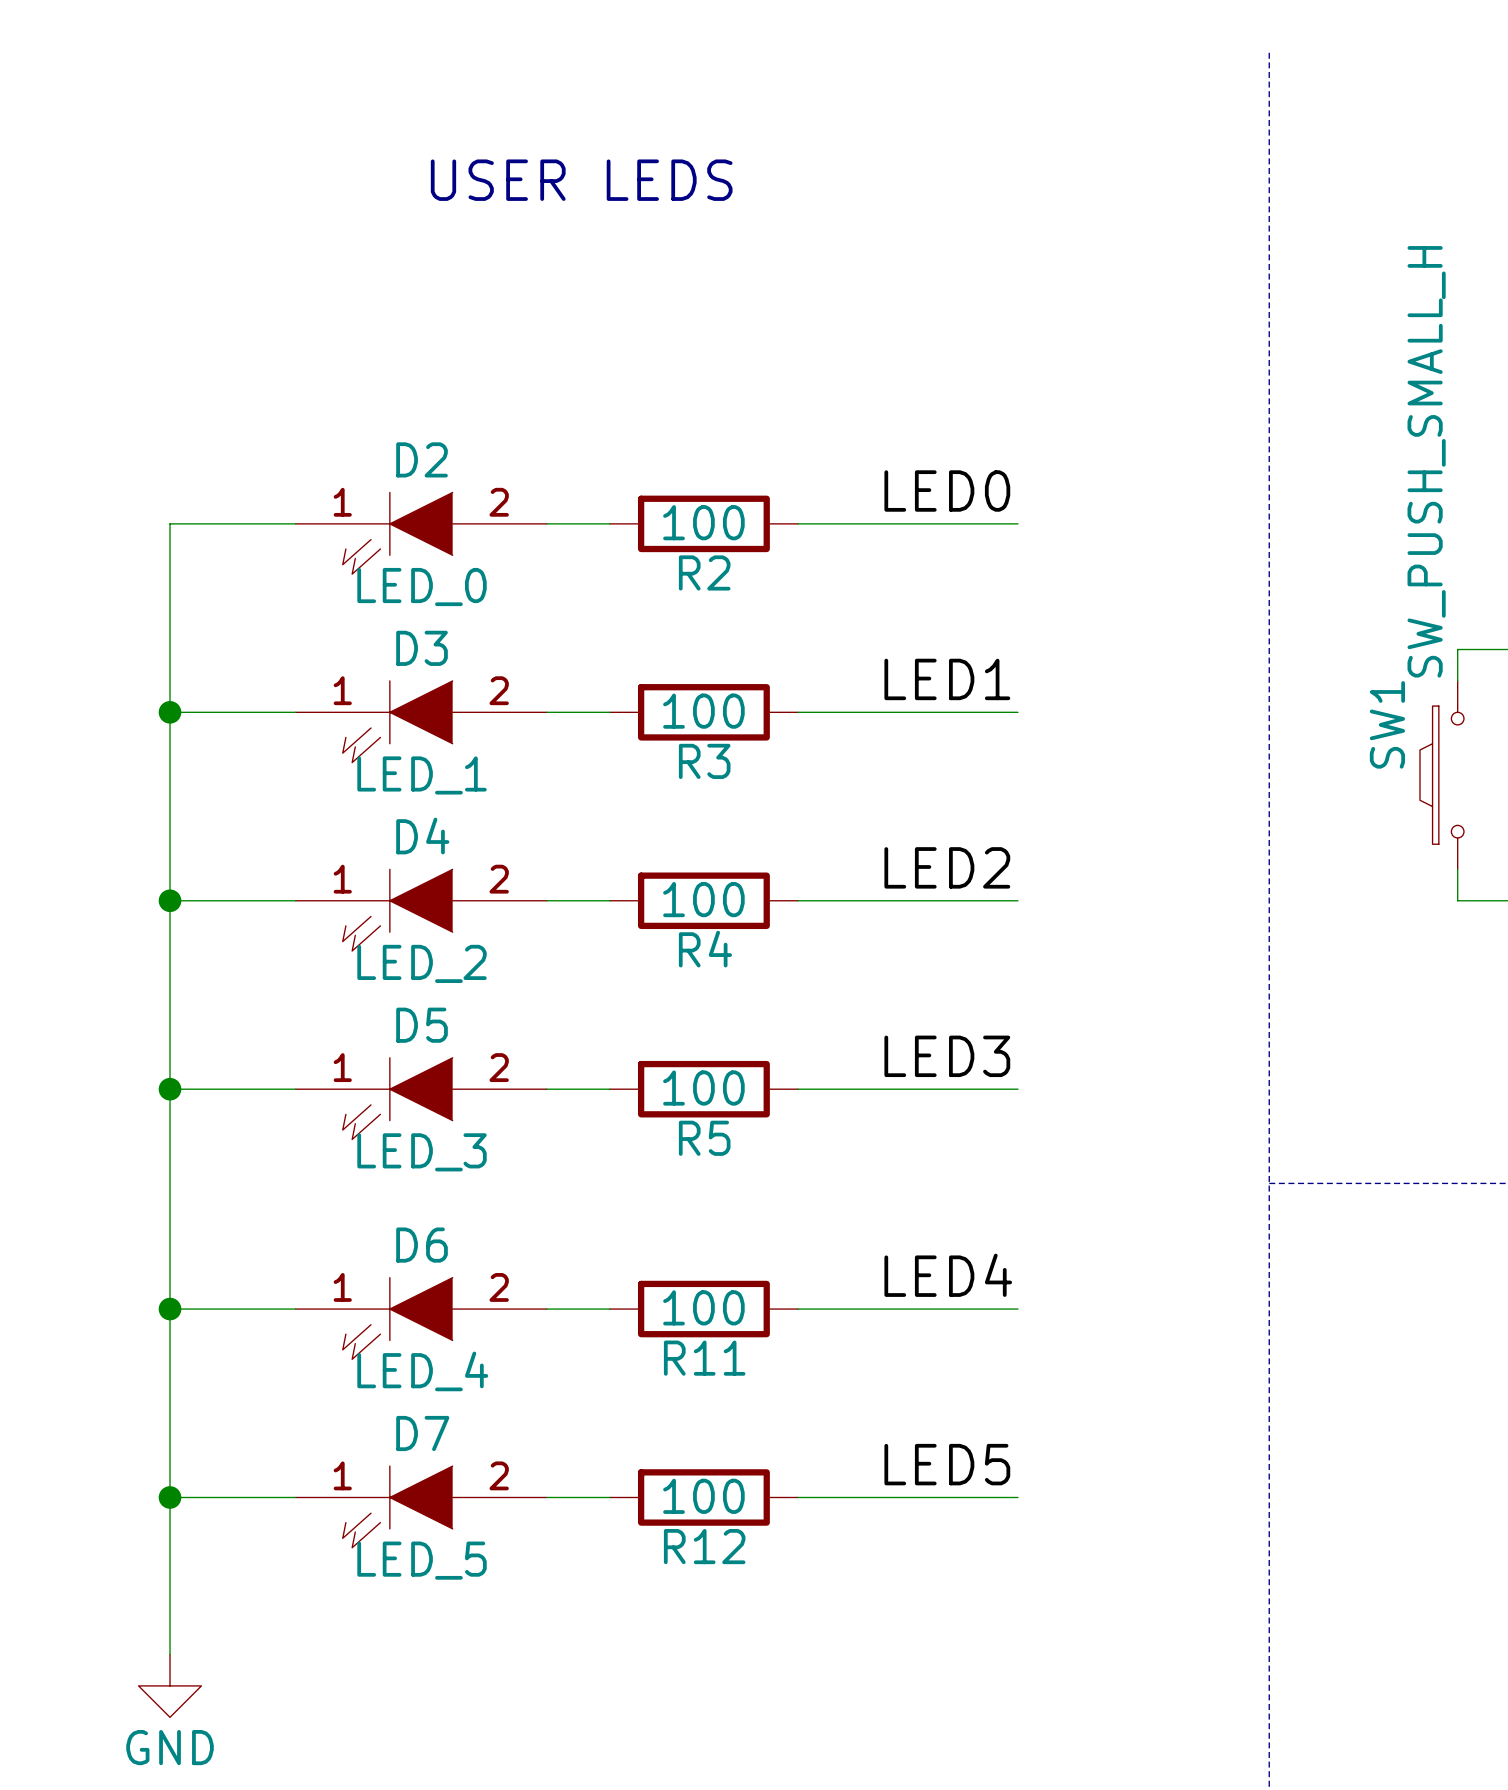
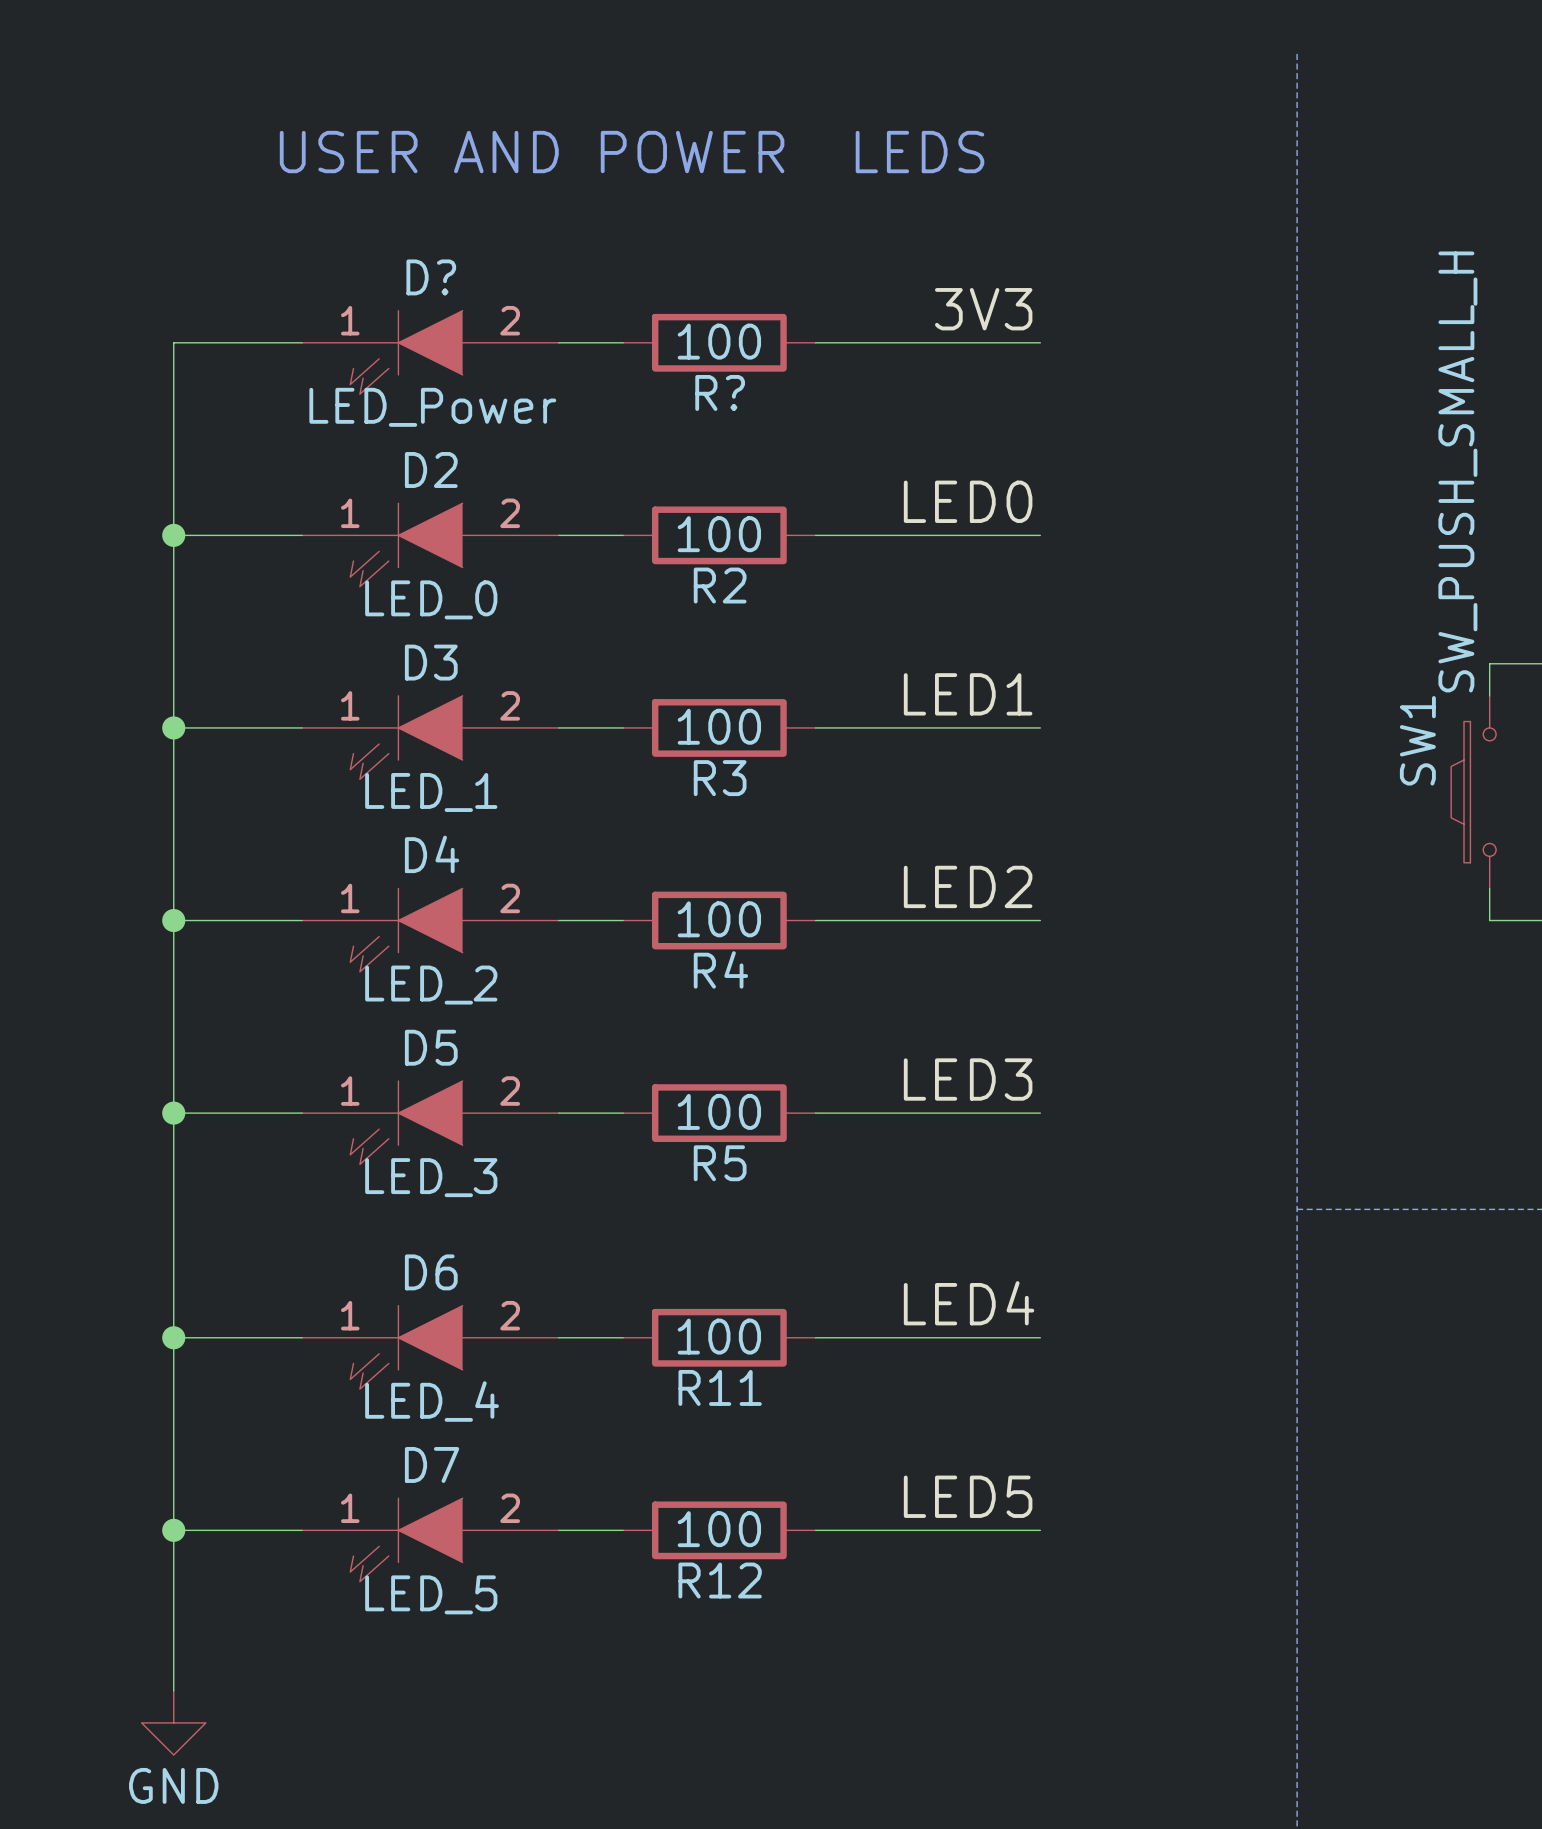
text: USER LEDS (581, 180) -> USER AND POWER LEDS (632, 152)
label: none -> 3V3 (983, 309)
wire: none -> (302, 342) (173, 342) (173, 535)
wire: none -> (558, 342) (623, 342)
R?: none -> 100 (719, 342)
wire: none -> (815, 342) (1040, 342)
D?: none -> LED_Power (430, 352)
junction: none -> (173, 535)

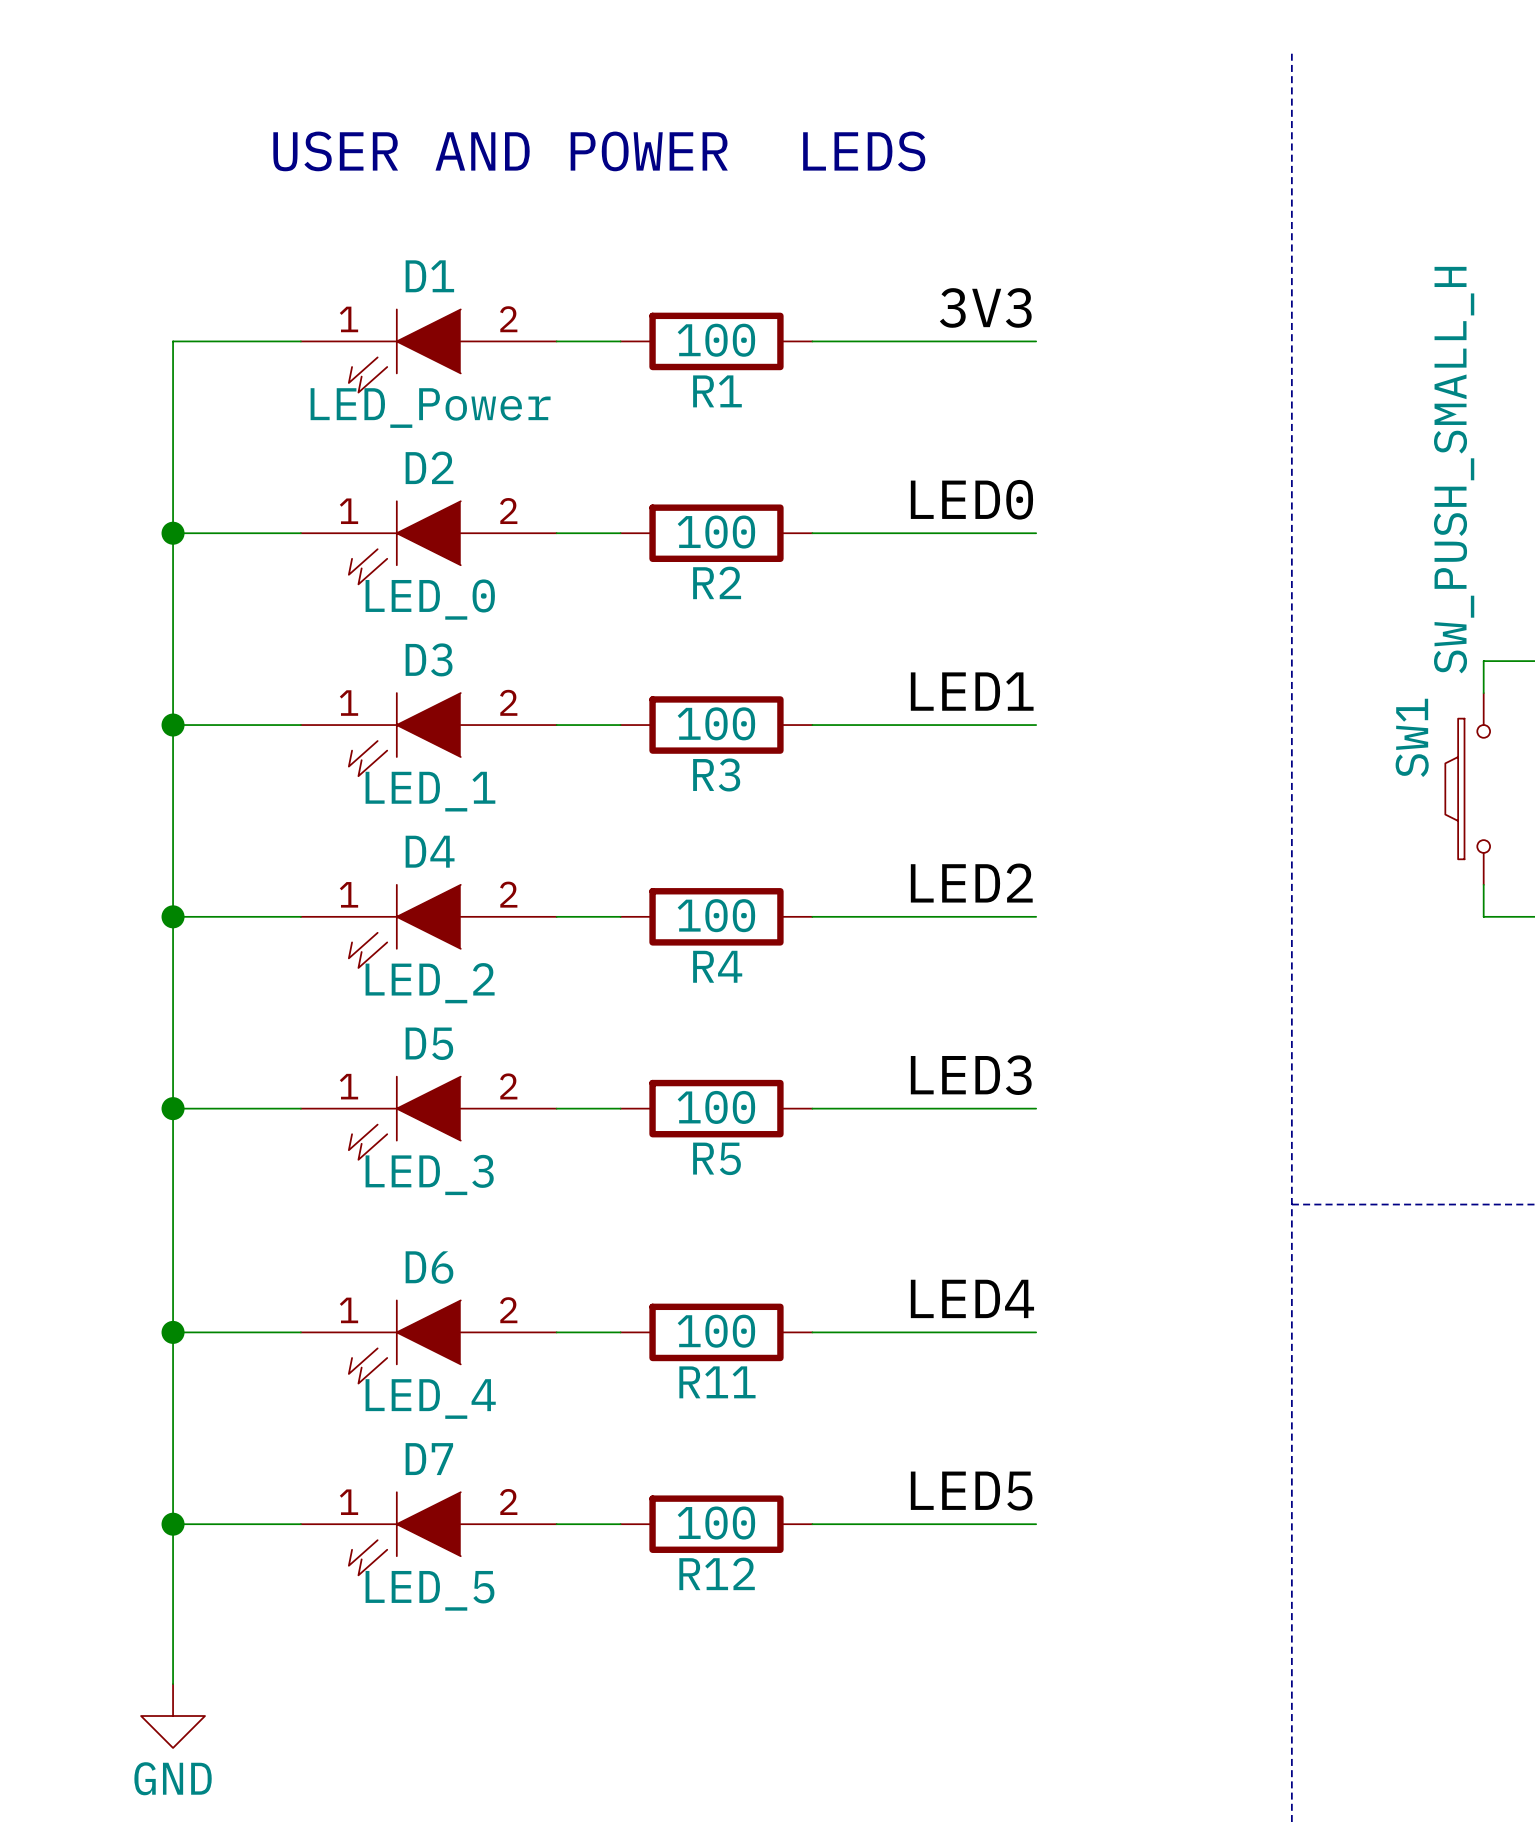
D? name: D? (431, 277) -> D1 (429, 276)
R? name: R? (720, 392) -> R1 (717, 391)

